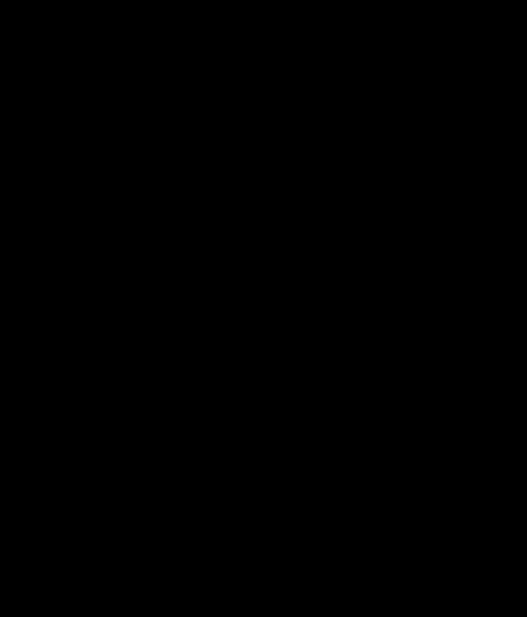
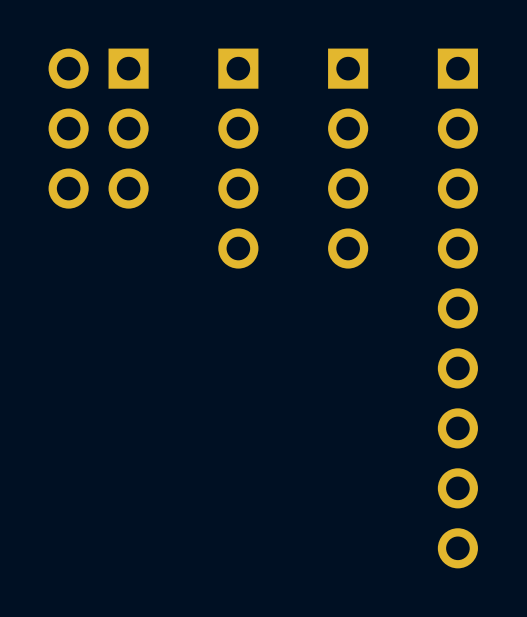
part: none -> (98, 128)
part: none -> (238, 158)
part: none -> (348, 158)
part: none -> (457, 308)

